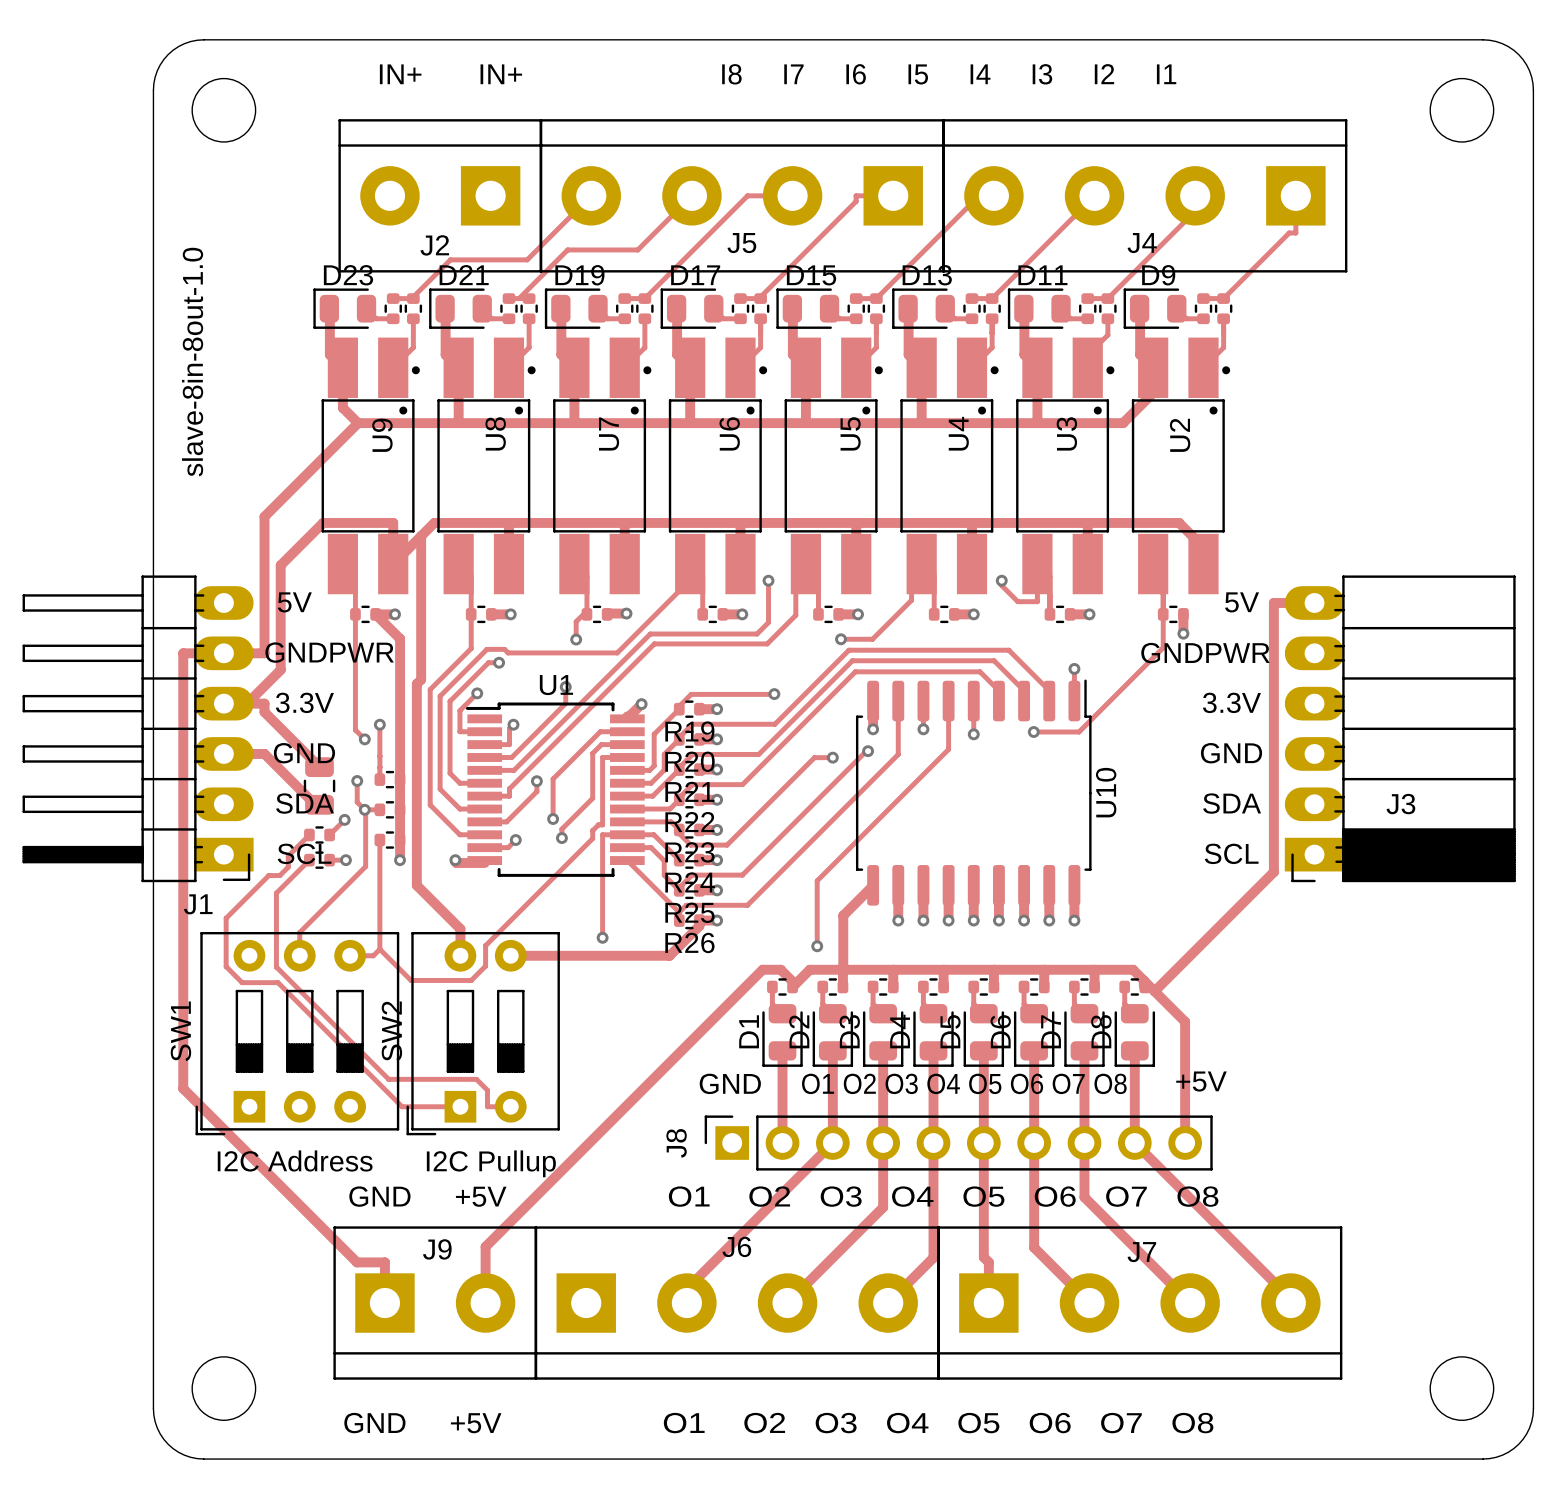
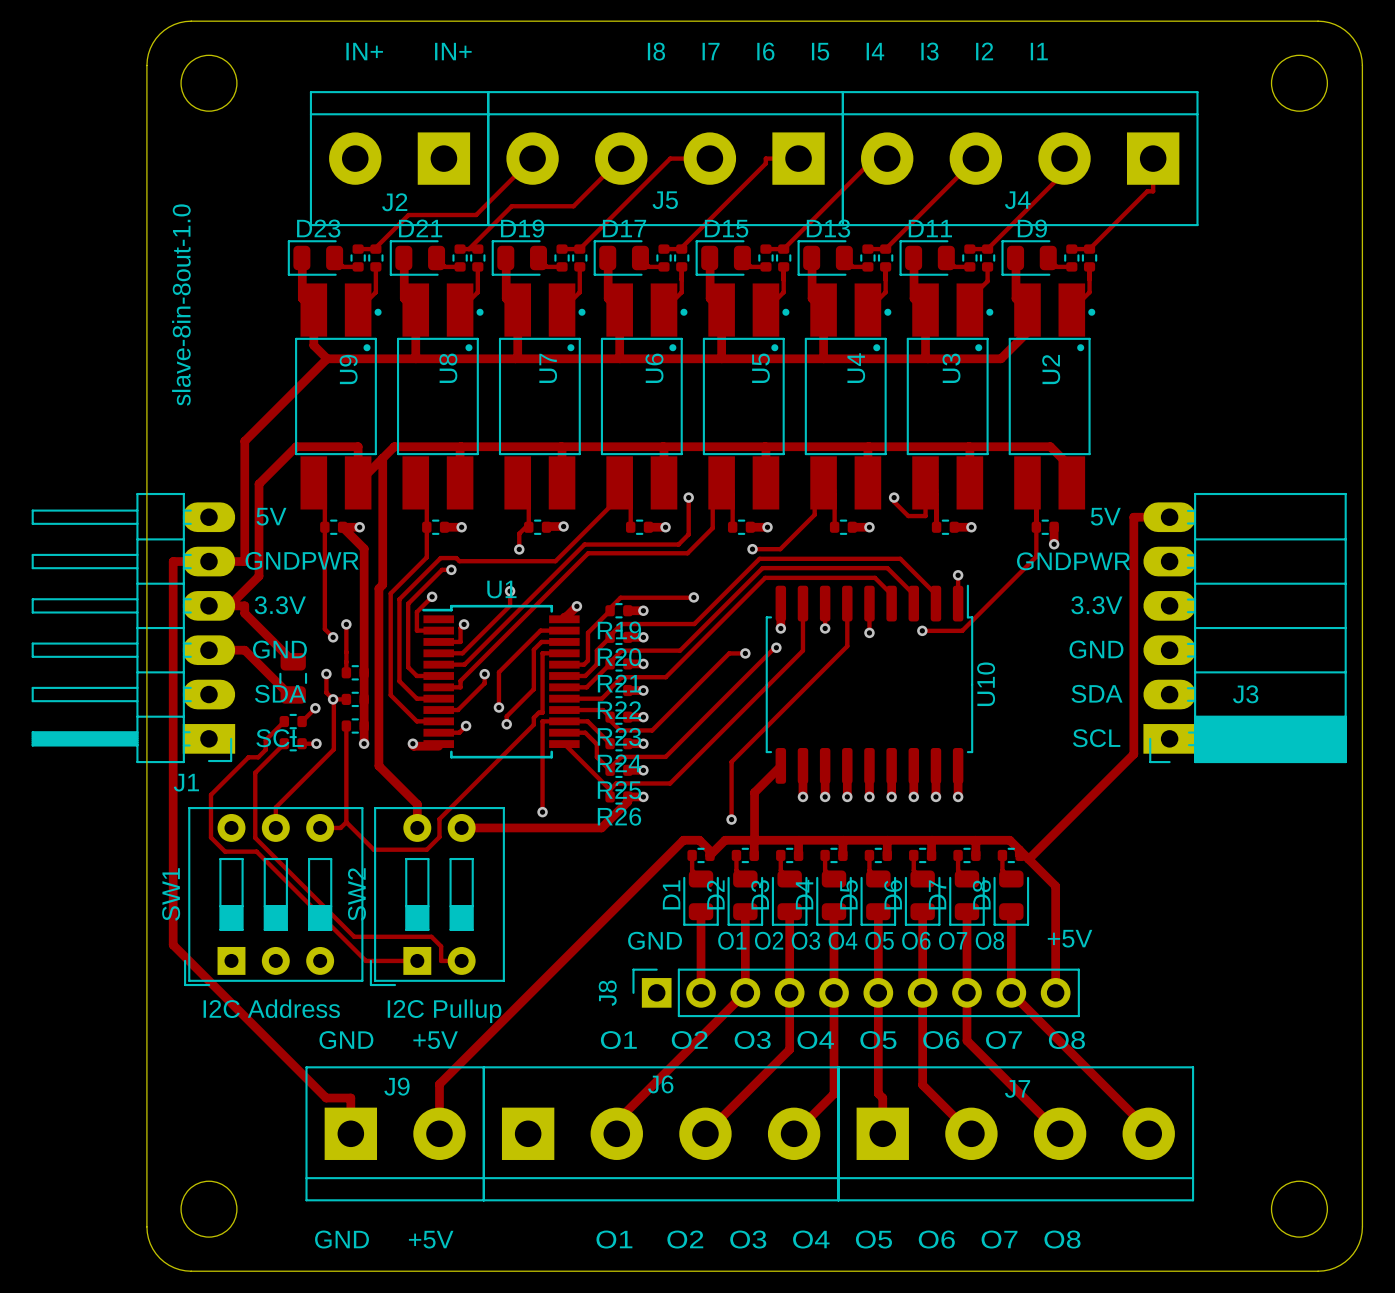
R22 footprint: [673, 791, 705, 809] -> [615, 682, 633, 699]

